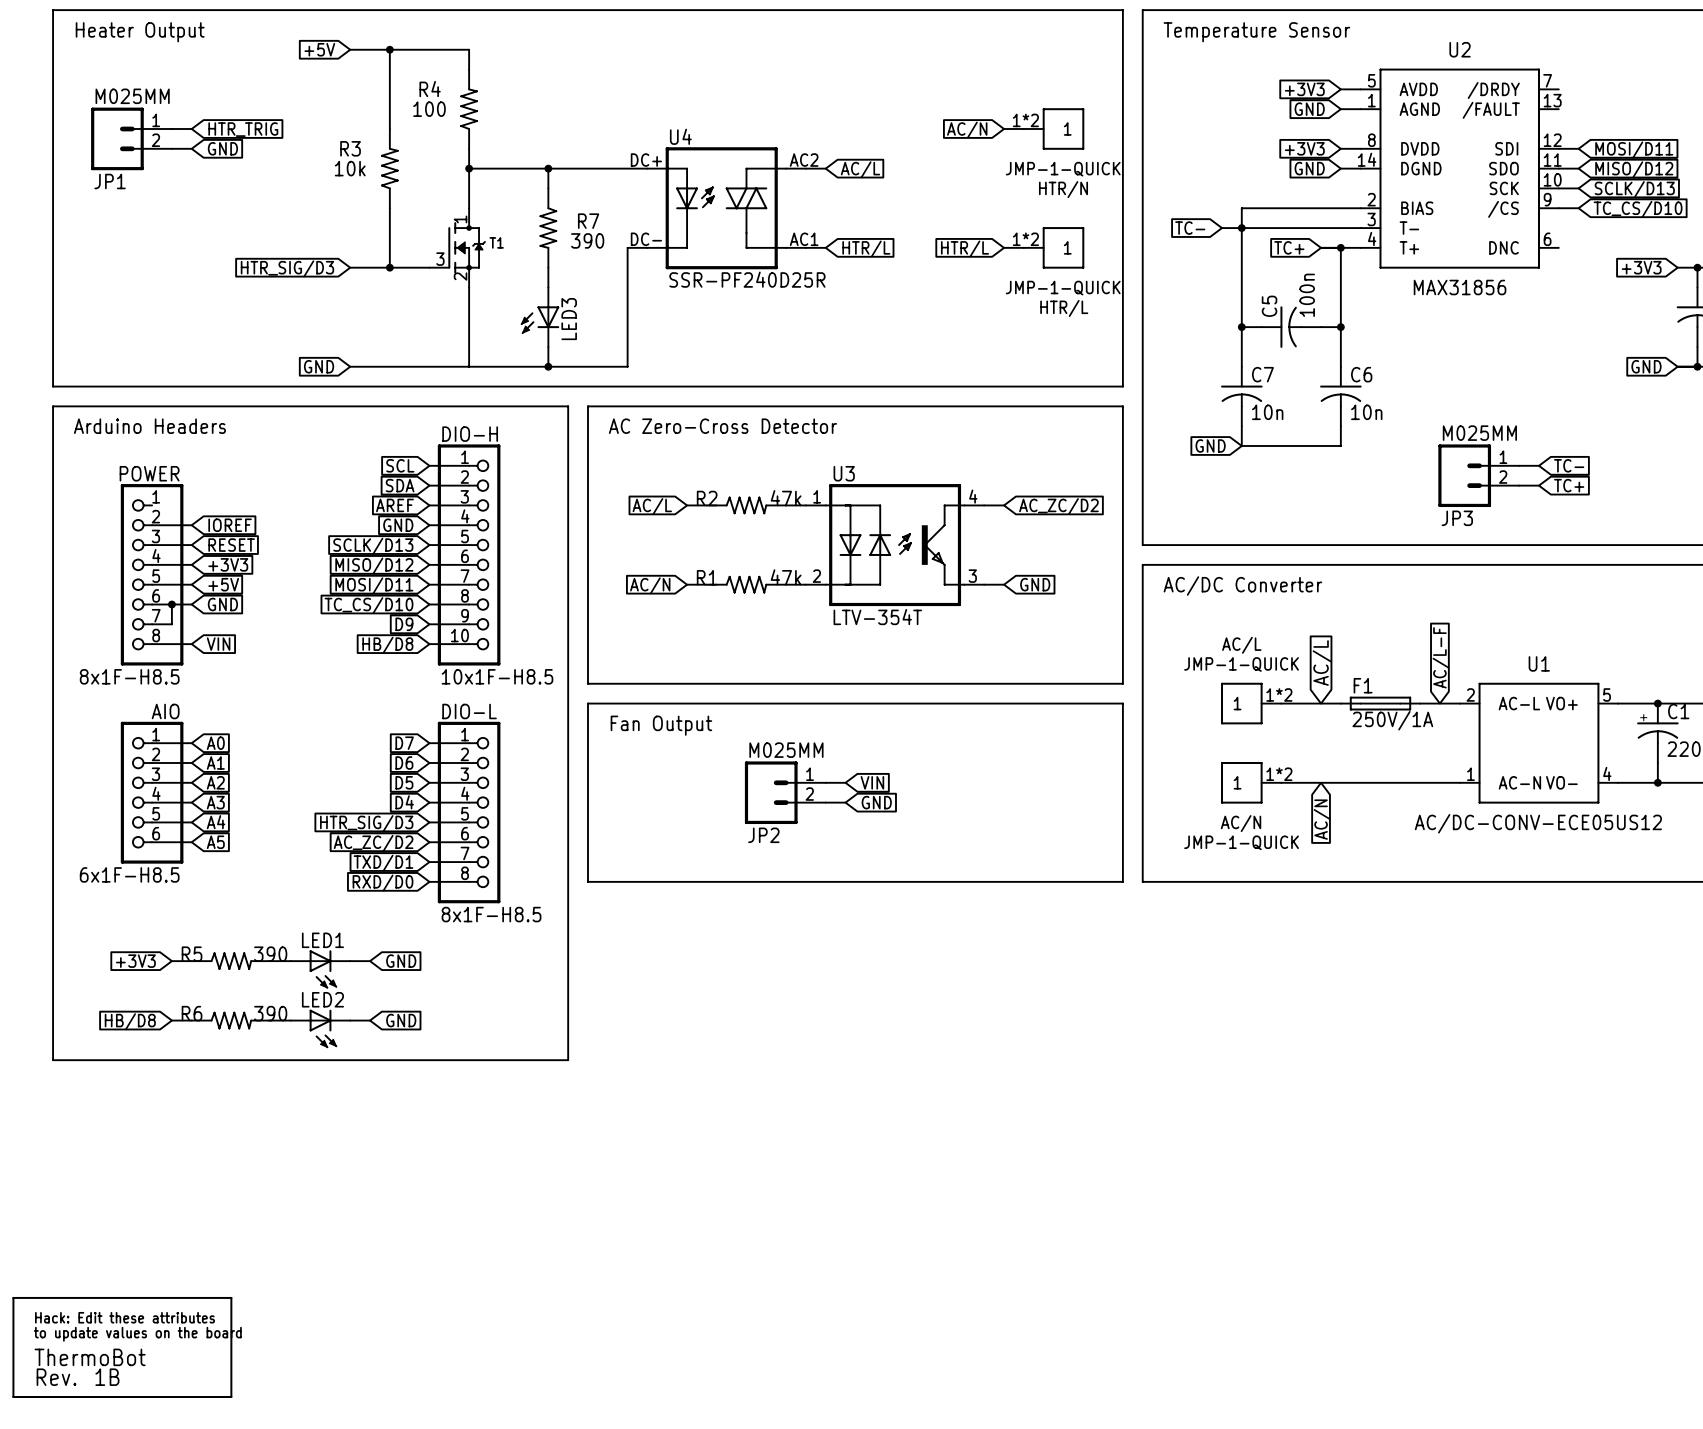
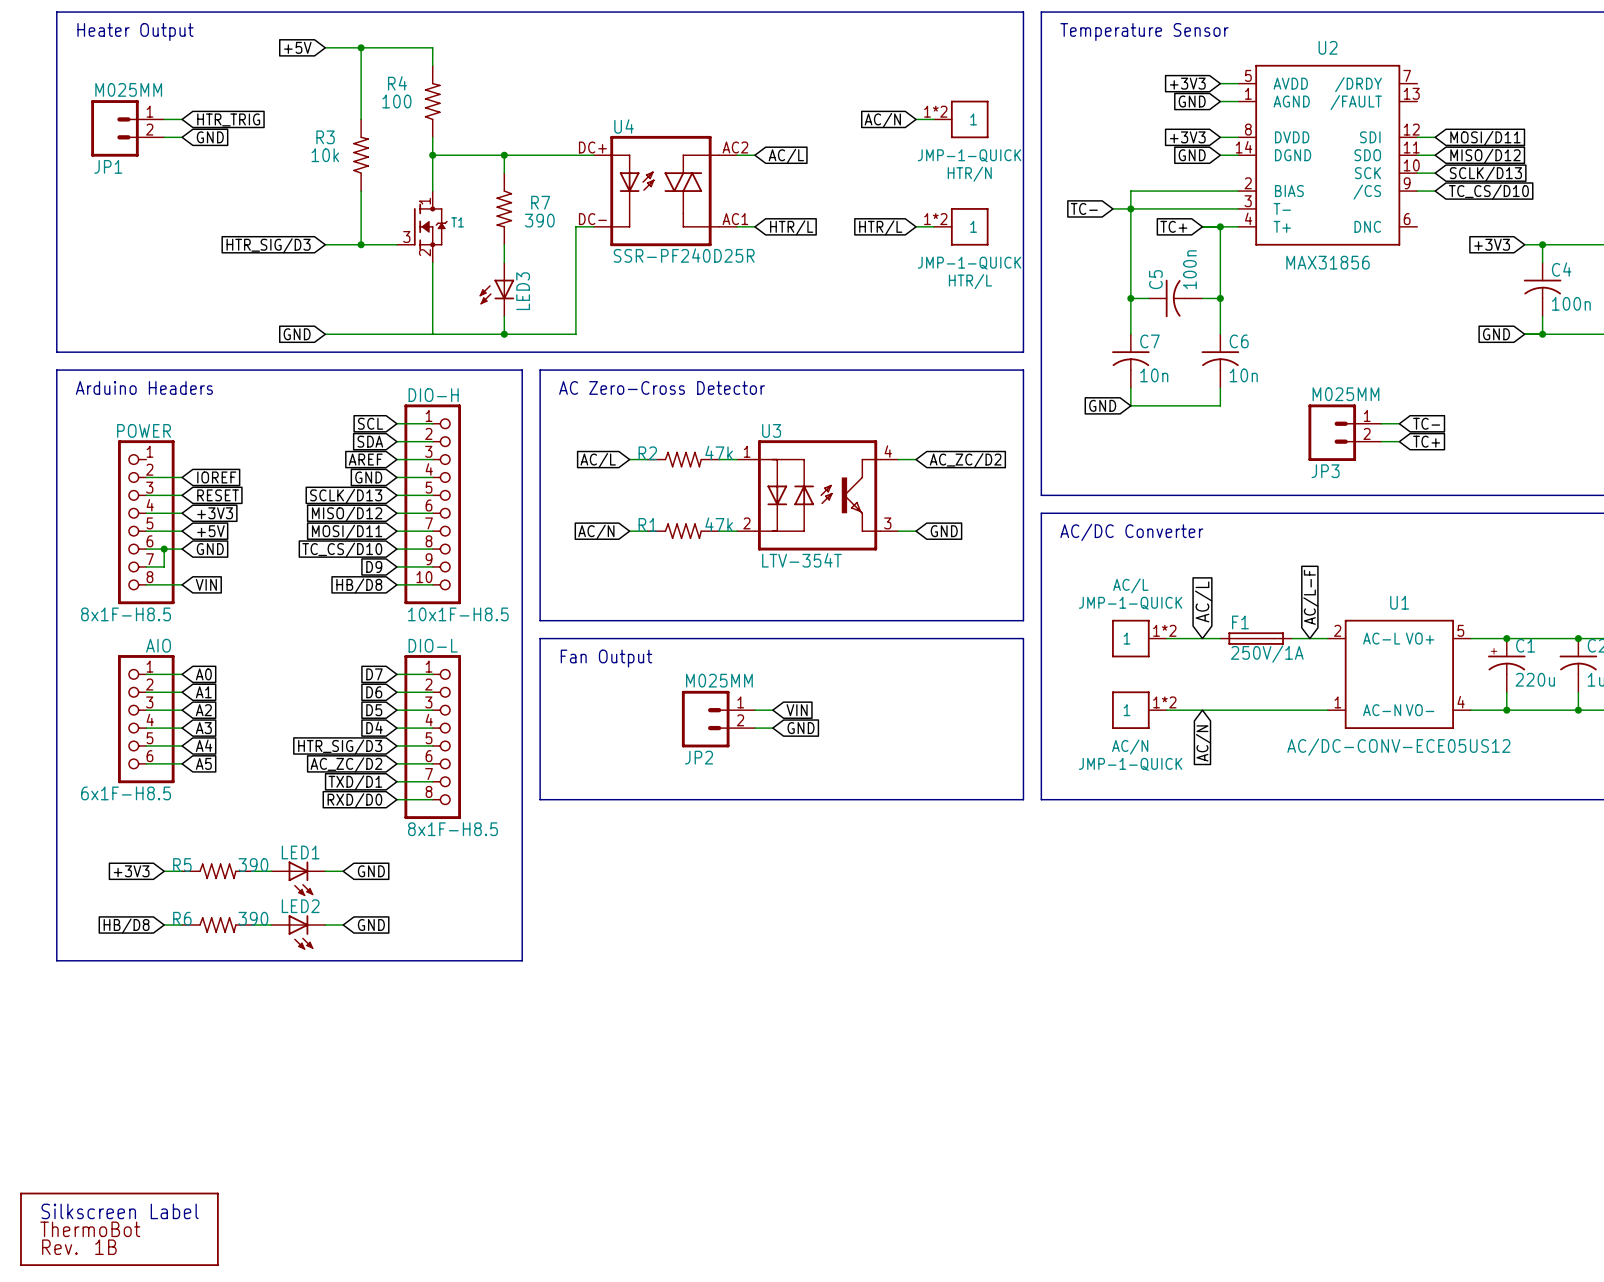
part: (122, 1347) -> none
part: none -> (119, 1229)

